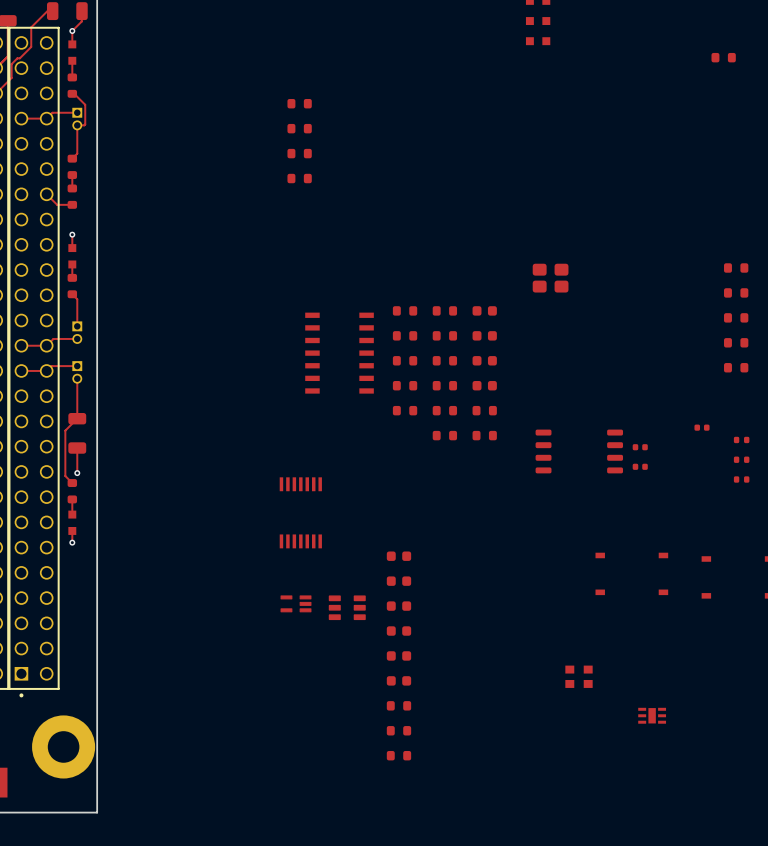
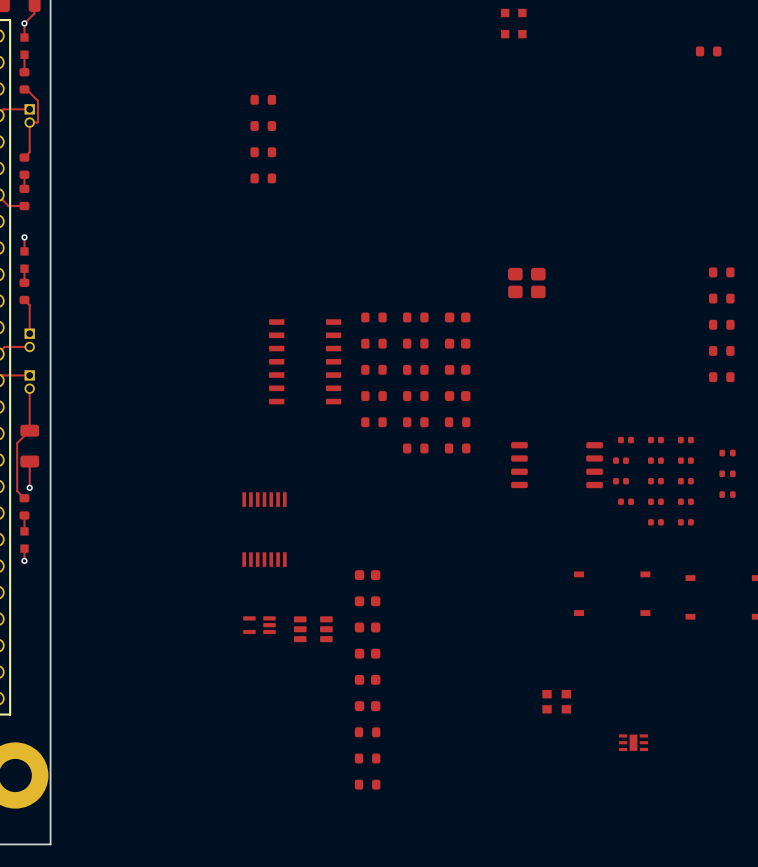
part: none -> (625, 440)
part: none -> (655, 440)
part: none -> (655, 460)
part: none -> (685, 460)
part: none -> (655, 481)
part: none -> (685, 481)
part: none -> (625, 501)
part: none -> (655, 501)
part: none -> (685, 501)
part: none -> (655, 522)
part: none -> (685, 522)

